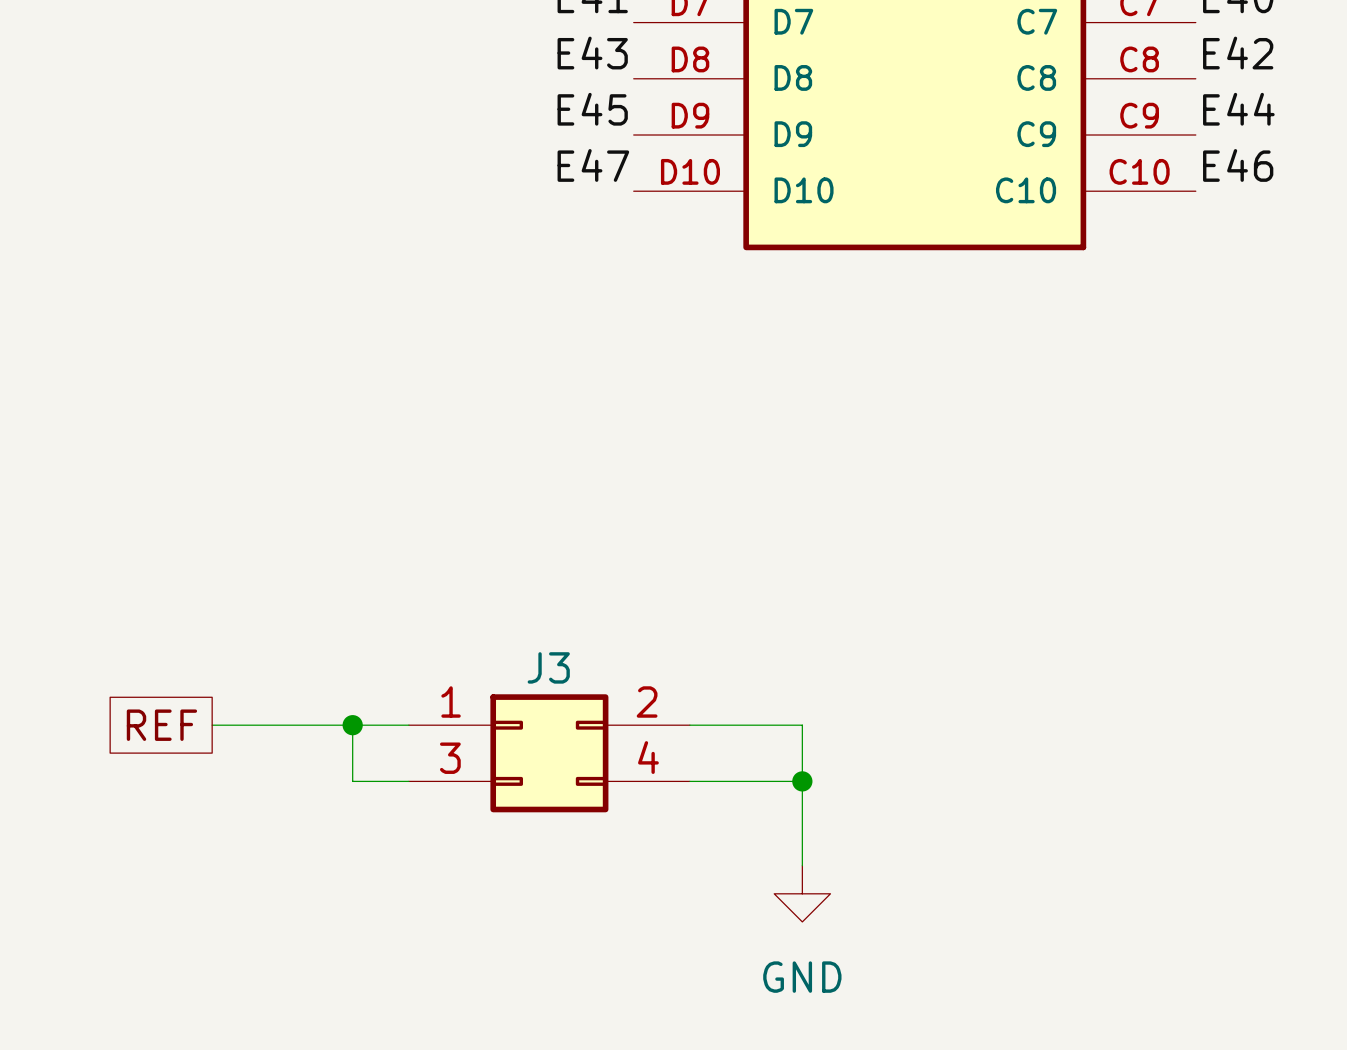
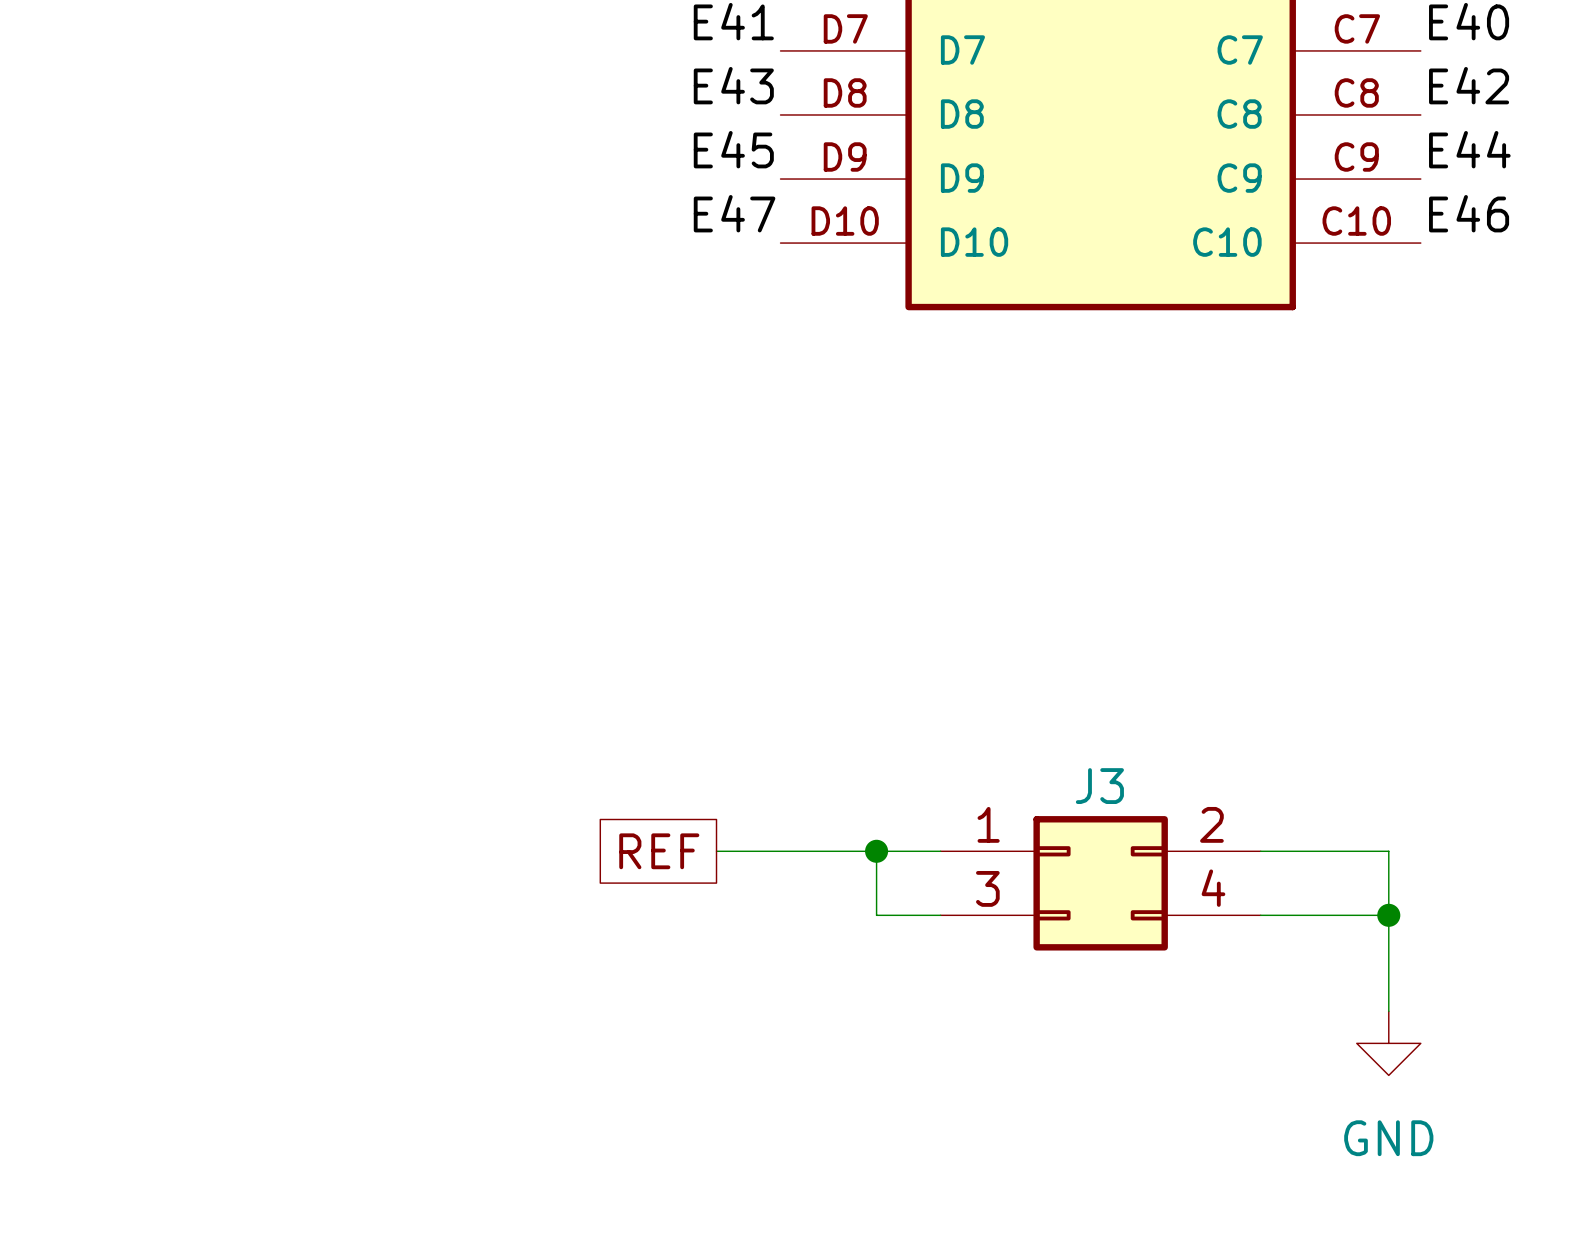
global label position: REF (161, 725) -> REF (659, 851)
wire: (212, 725) (408, 725) -> none
wire: (352, 725) (352, 781) (408, 781) -> none
junction: (352, 725) -> none
wire: (774, 725) (802, 725) (802, 865) -> none
wire: none -> (1260, 851) (1388, 851) (1388, 1011)
J3 position: (549, 753) -> (1100, 883)
wire: (689, 781) (718, 781) -> (876, 851) (876, 915)
junction position: (802, 781) -> (876, 851)
wire: none -> (1260, 915) (1388, 915)
junction: none -> (1388, 915)
power symbol position: GND (802, 893) -> GND (1388, 1043)

